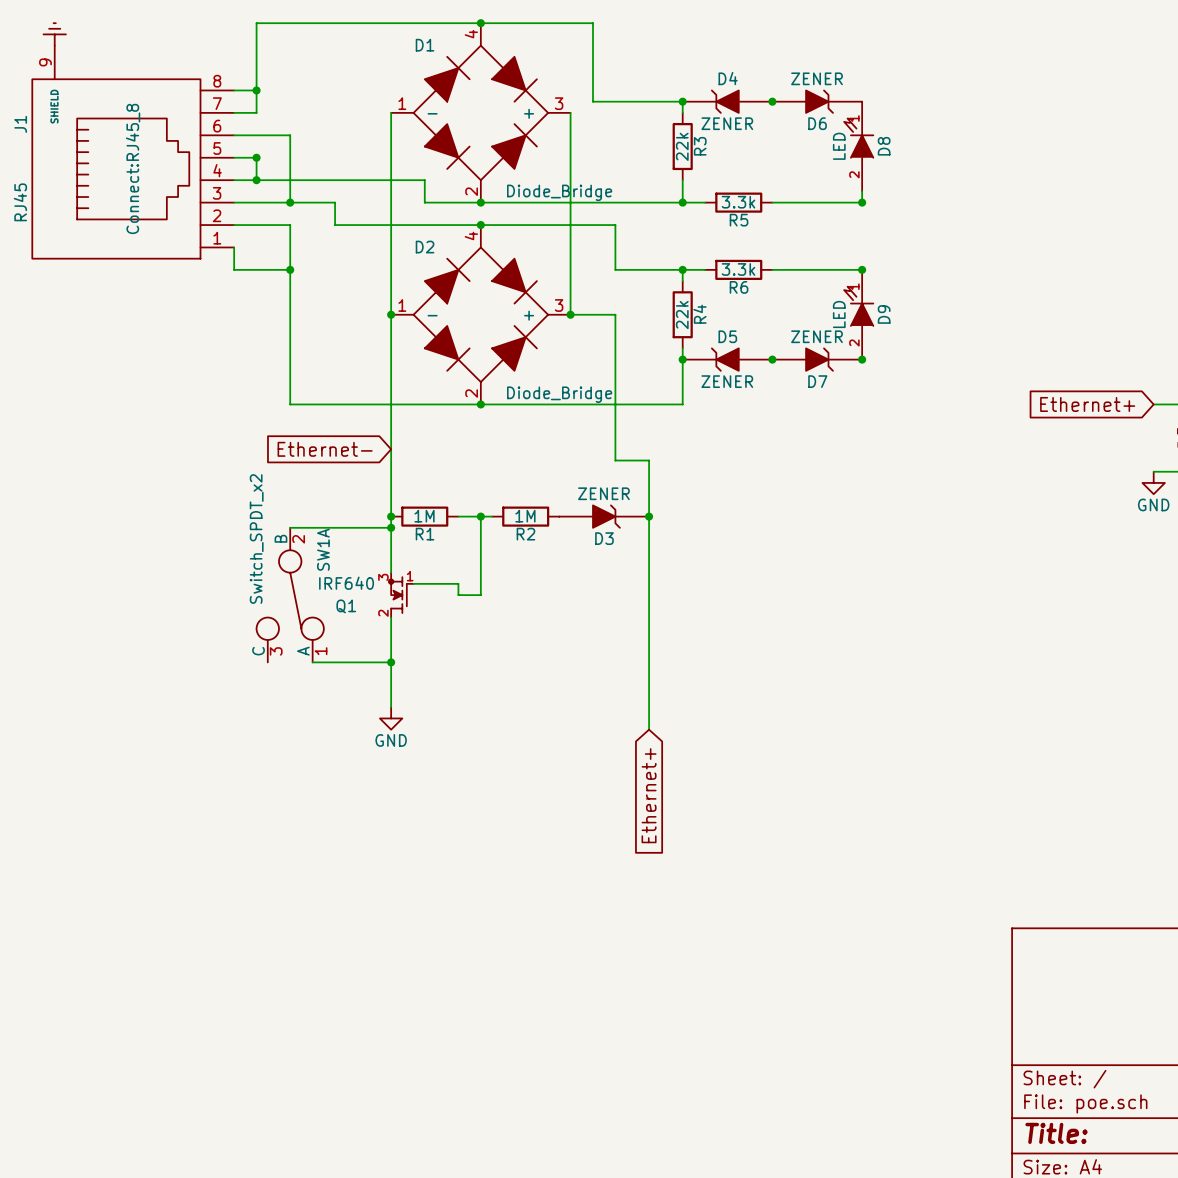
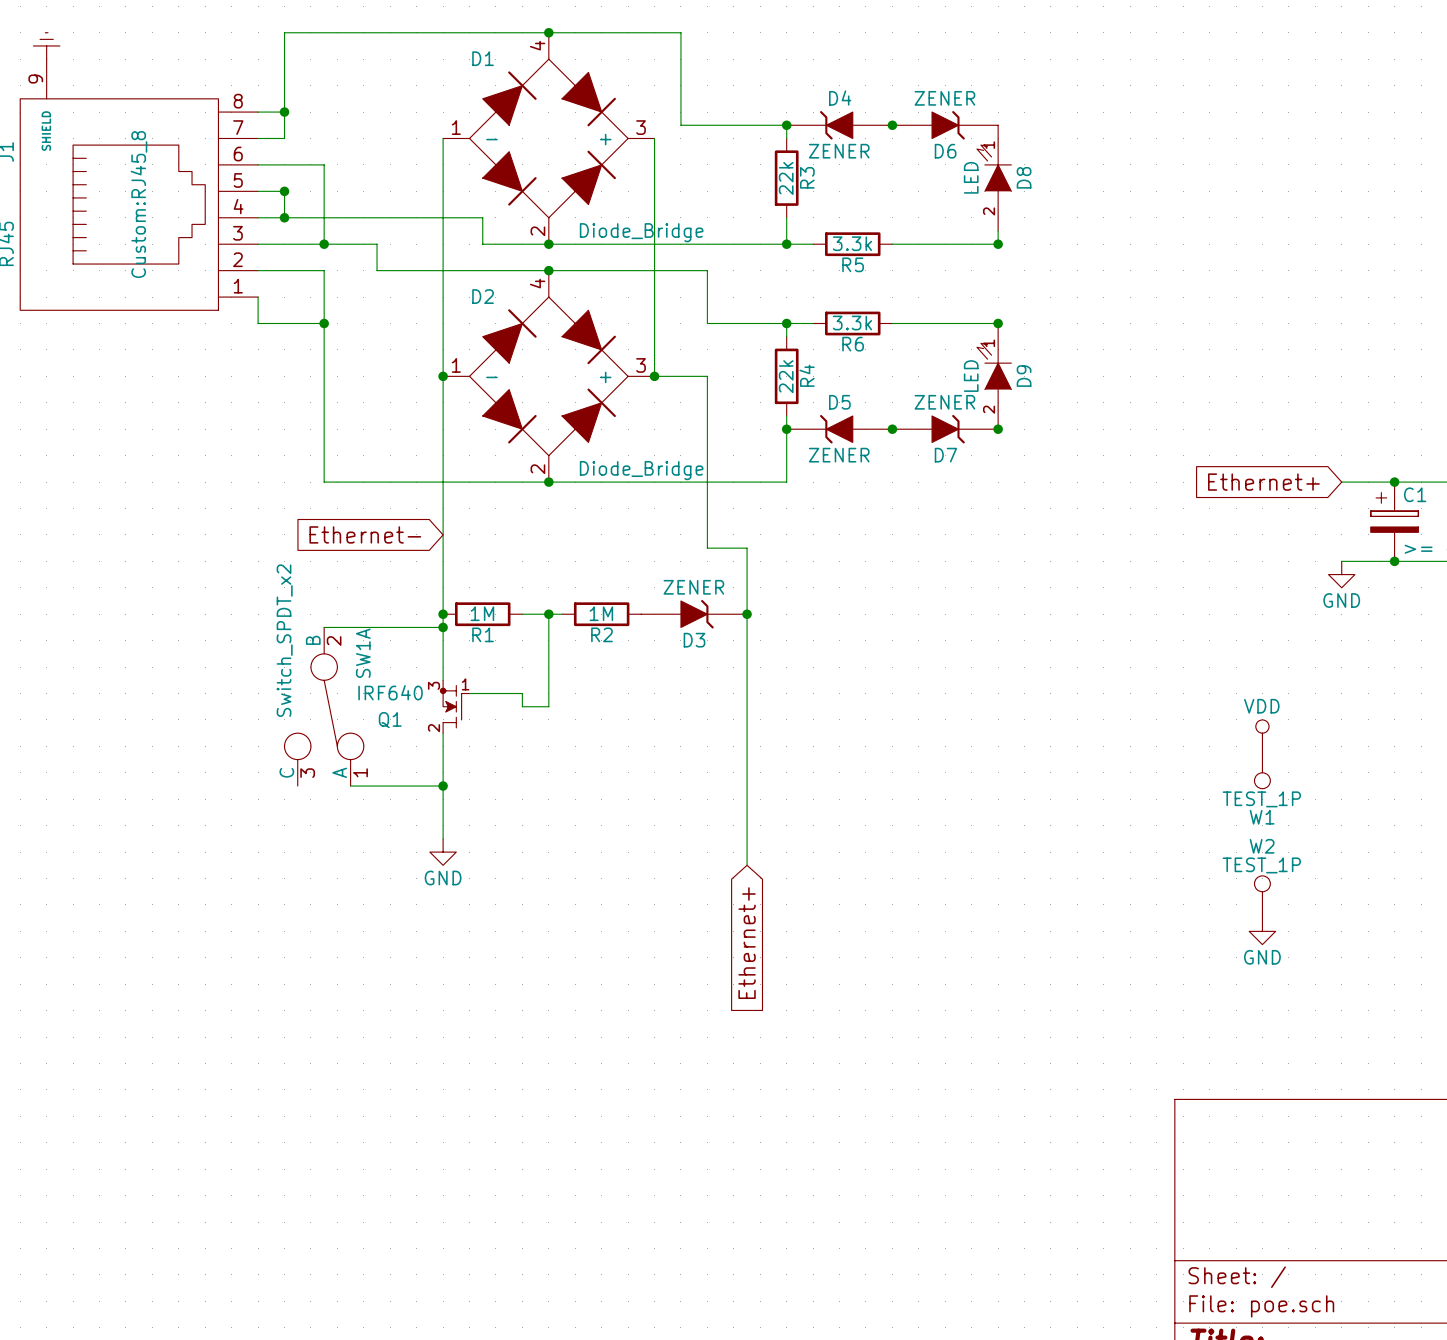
J1 text: Connect:RJ45_8 (133, 168) -> Custom:RJ45_8 (138, 204)
power symbol: none -> VDD (1262, 733)
W1: none -> TEST_1P (1262, 767)
W2: none -> TEST_1P (1262, 897)
power symbol: none -> GND (1262, 931)

